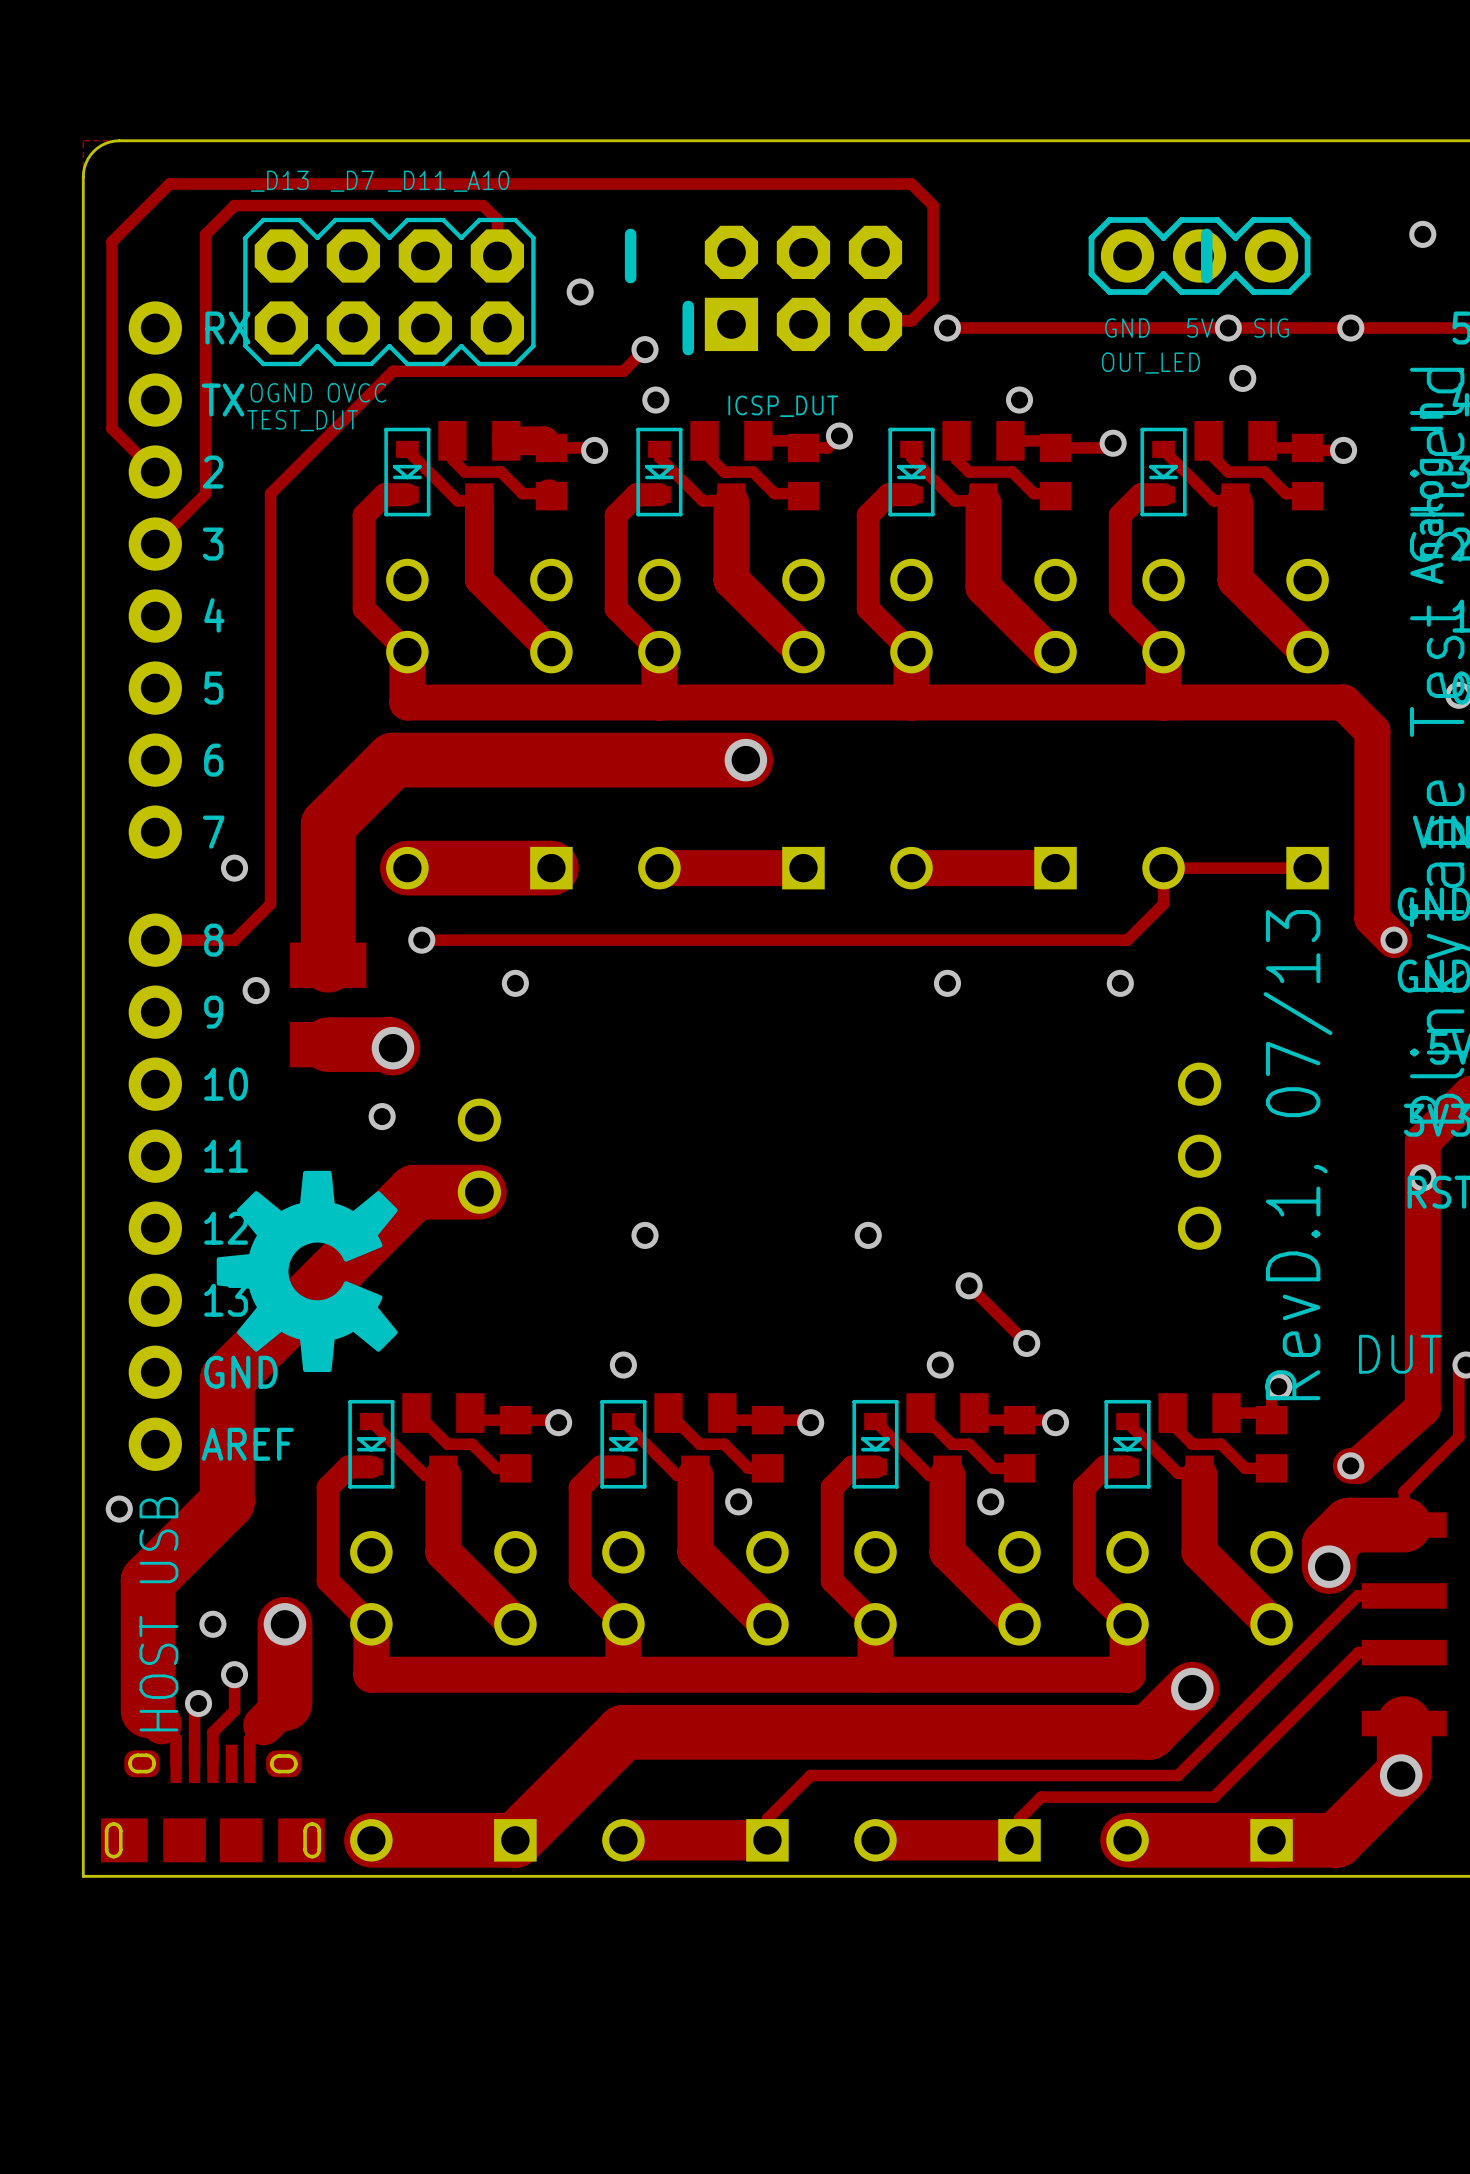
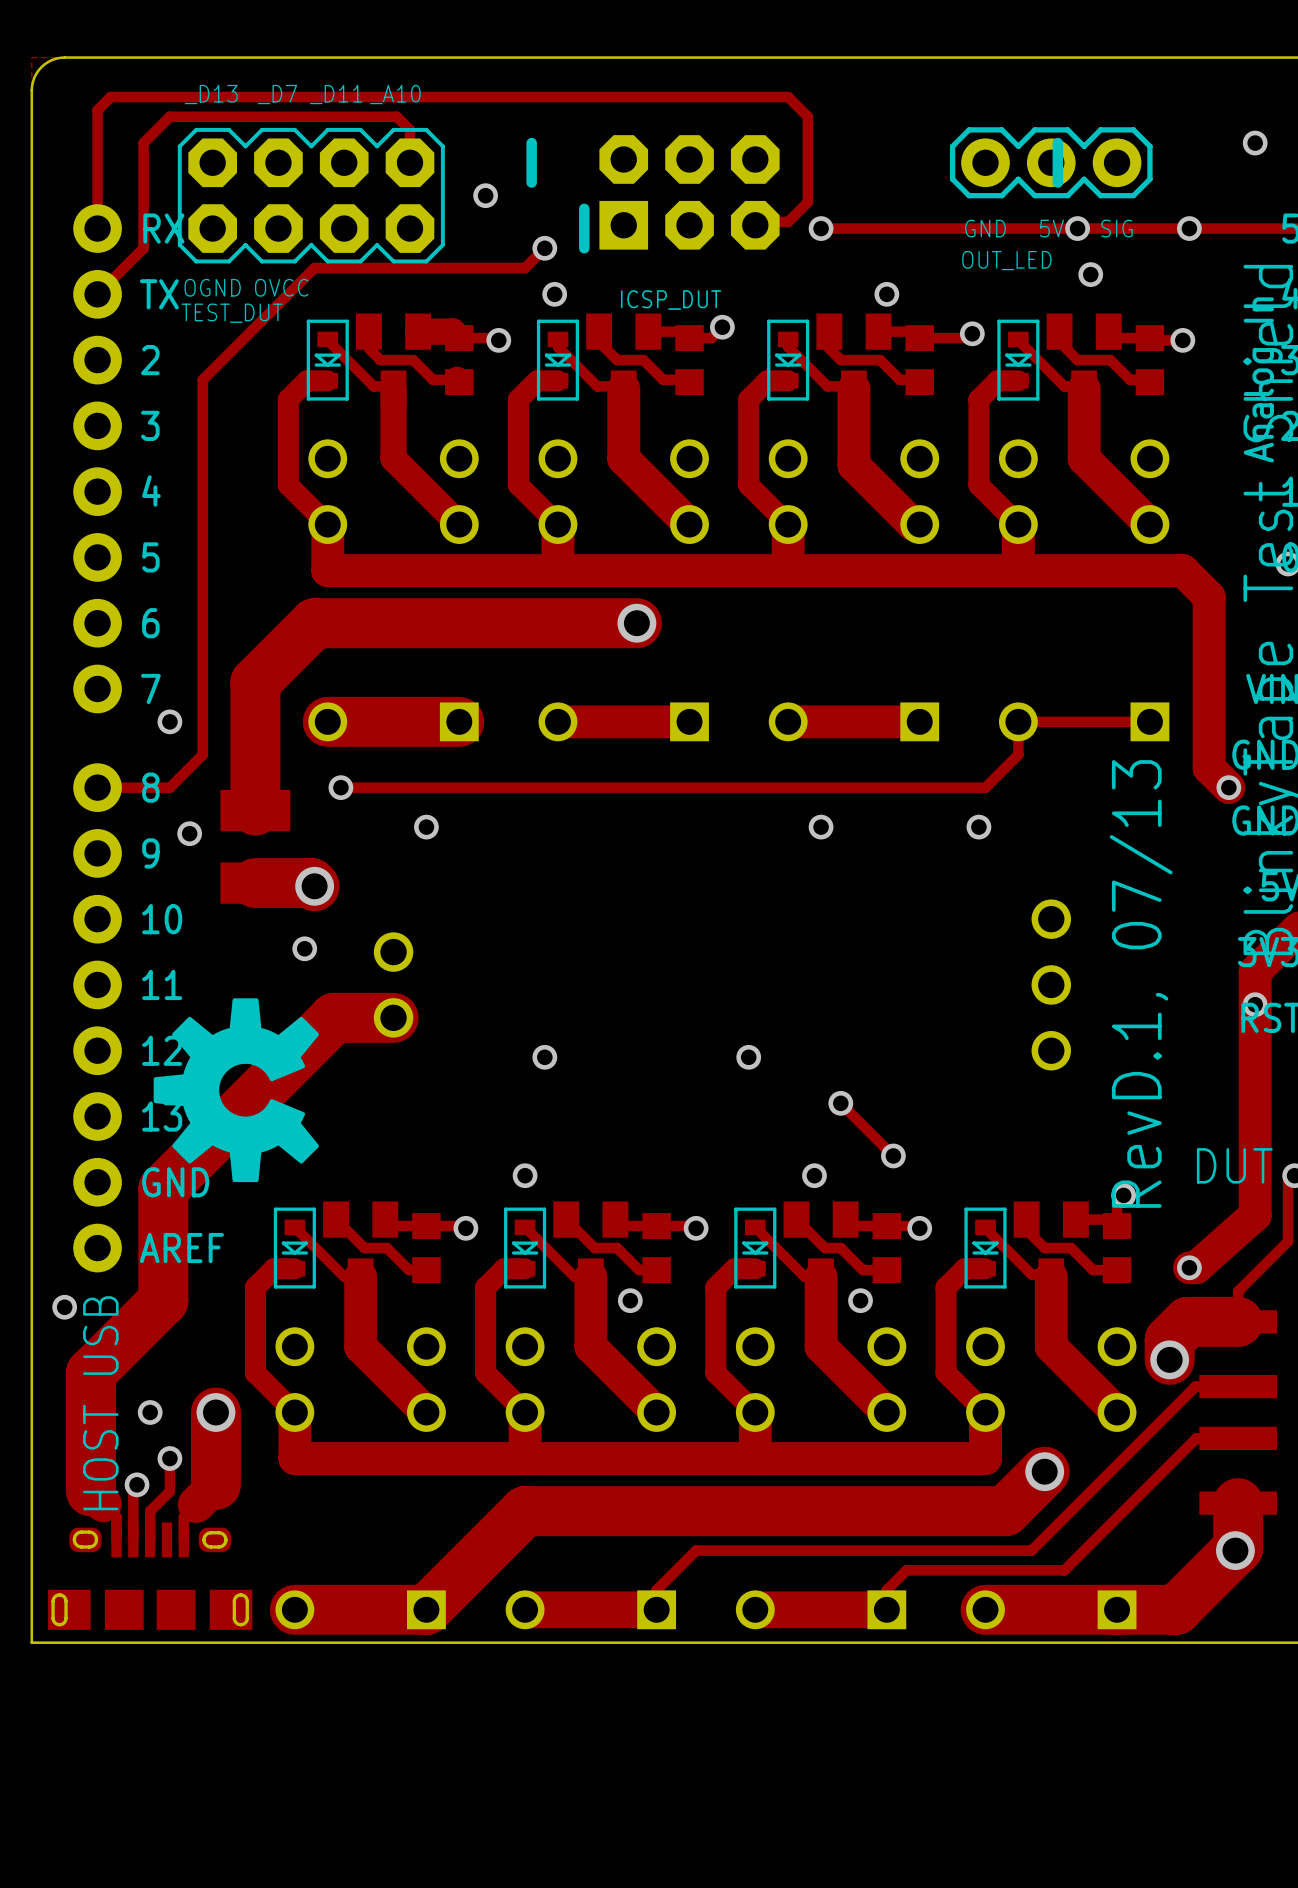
track: (155, 198) (112, 241) (112, 428) (155, 472) -> (97, 110) (97, 228)
track: (205, 349) (205, 493) (155, 544) -> (143, 248) (97, 294)

